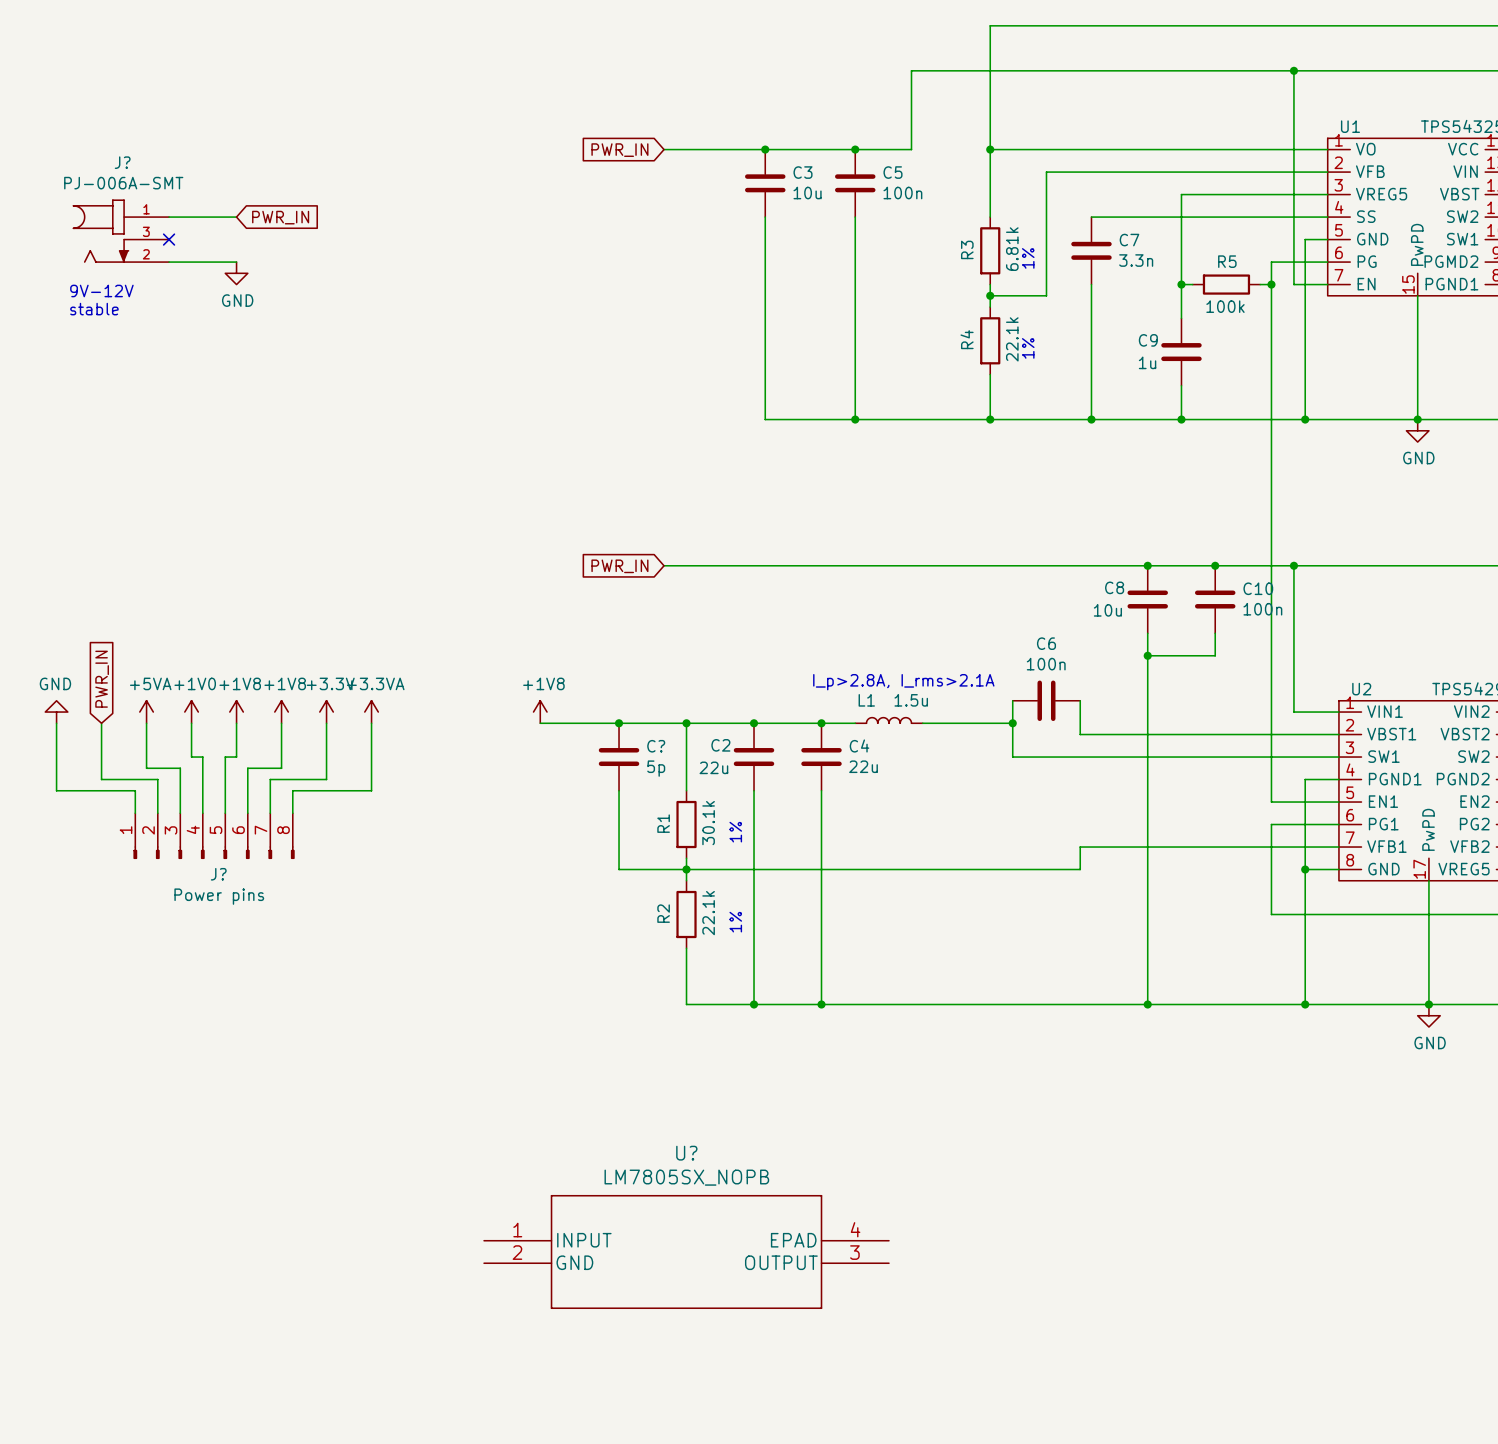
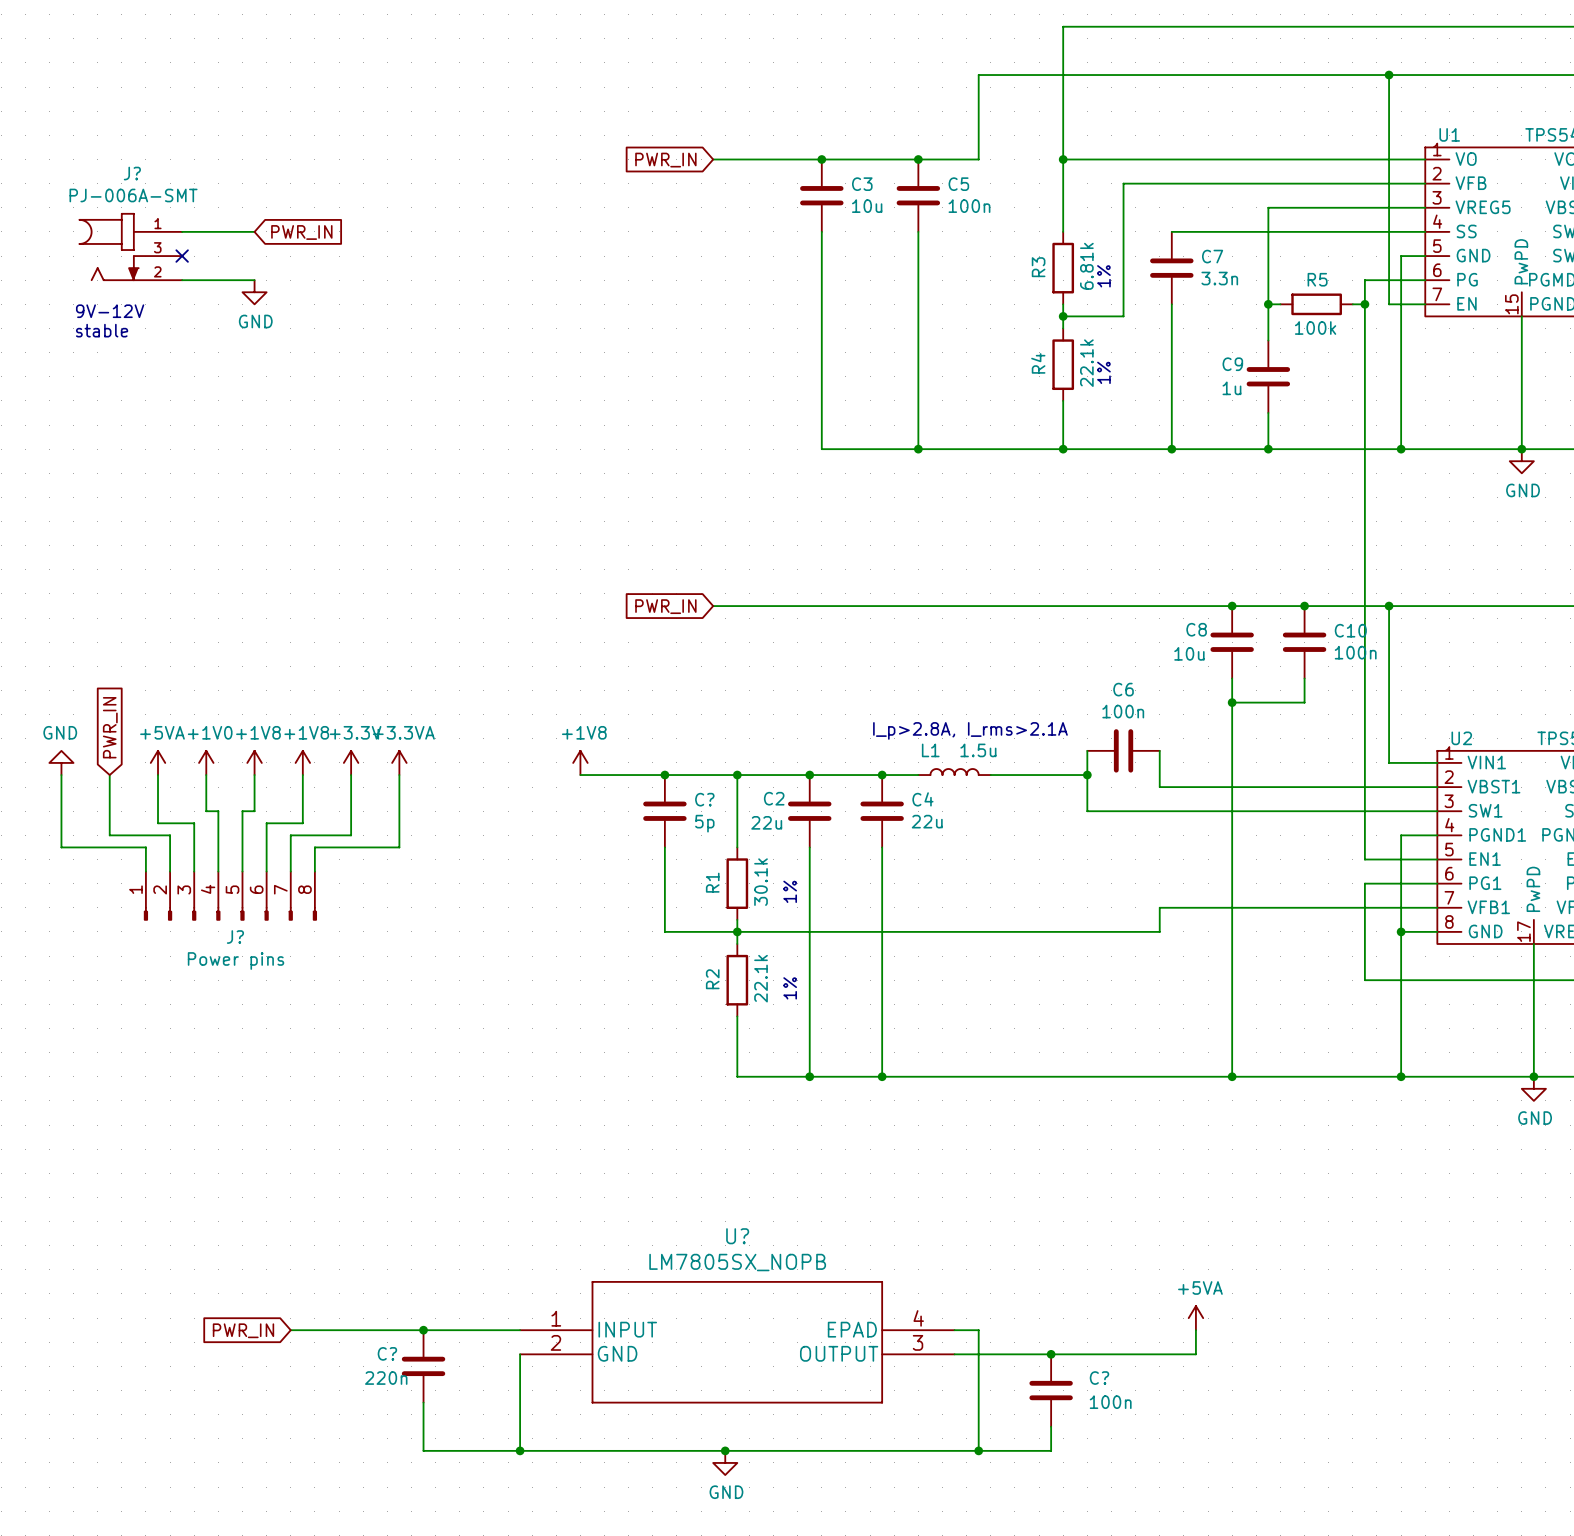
power symbol: none -> +5VA (1195, 1318)
wire: none -> (290, 1330) (520, 1330)
junction: none -> (423, 1330)
wire: none -> (954, 1330) (978, 1330) (978, 1450)
wire: none -> (1195, 1330) (1195, 1354) (954, 1354)
global label: none -> PWR_IN (243, 1330)
wire: none -> (520, 1354) (520, 1450)
junction: none -> (1051, 1354)
C?: none -> 220n (423, 1366)
C?: none -> 100n (1051, 1390)
wire: none -> (423, 1402) (423, 1450) (1051, 1450) (1051, 1426)
junction: none -> (520, 1450)
junction: none -> (725, 1450)
junction: none -> (978, 1450)
power symbol: none -> GND (725, 1462)

